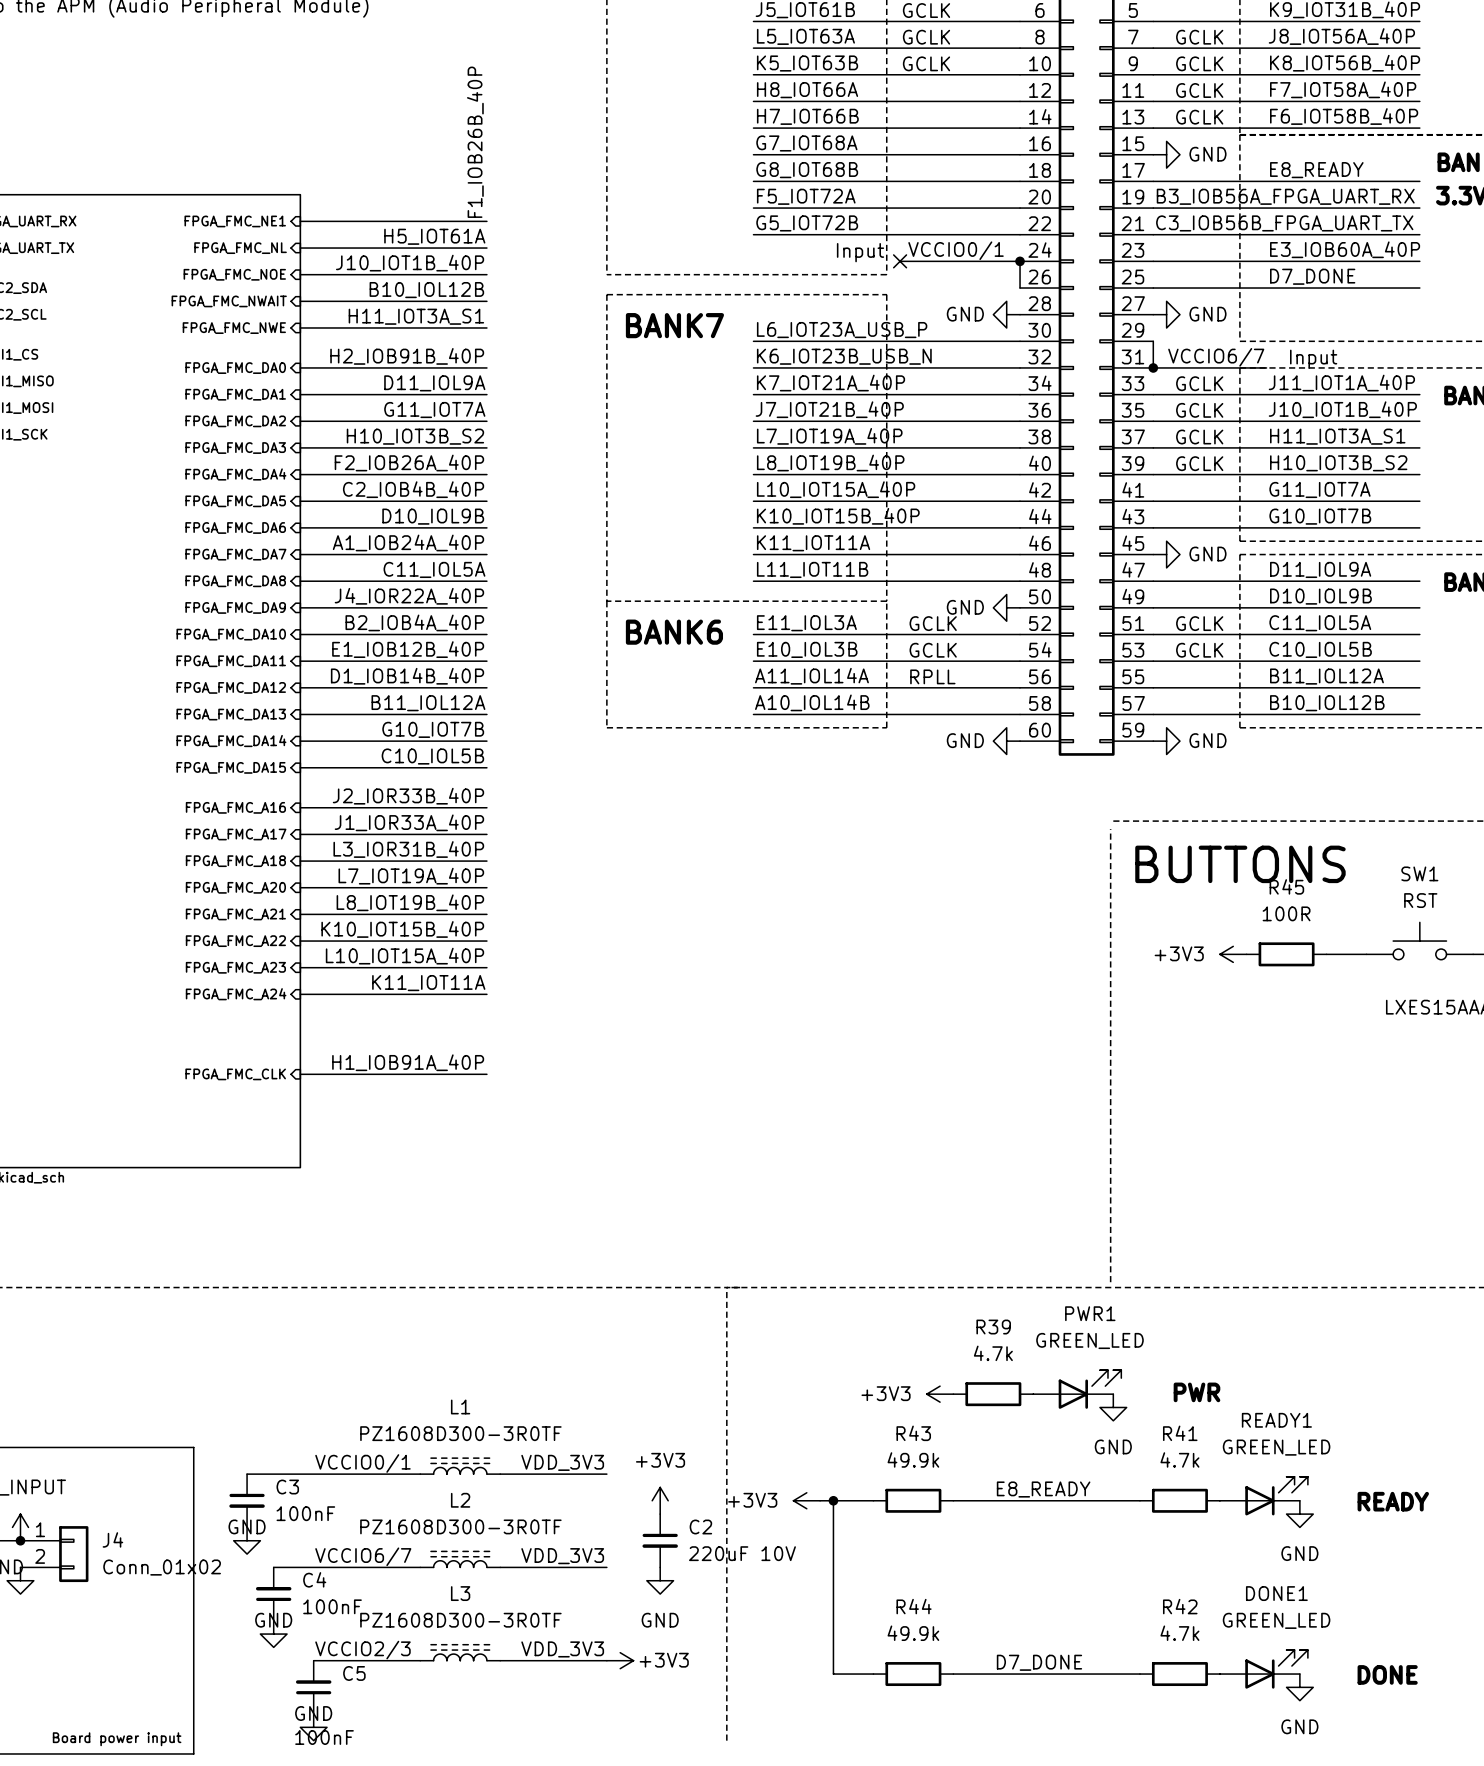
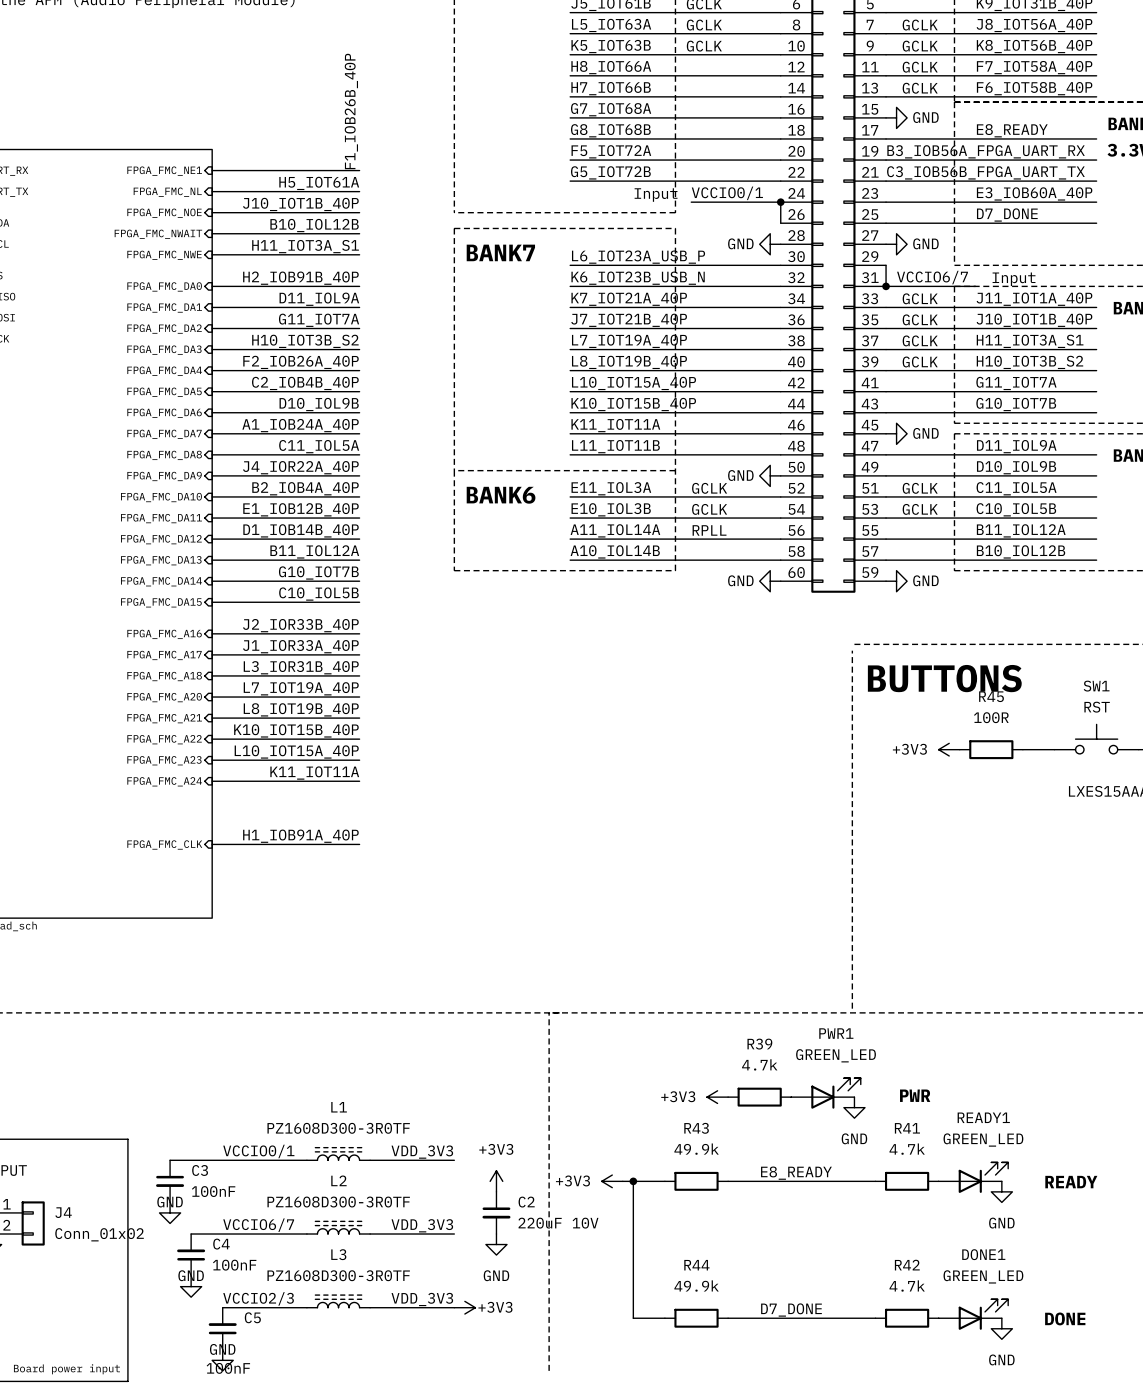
wire: (900, 261) (906, 261) -> none
no-connect mark: (900, 261) -> none

